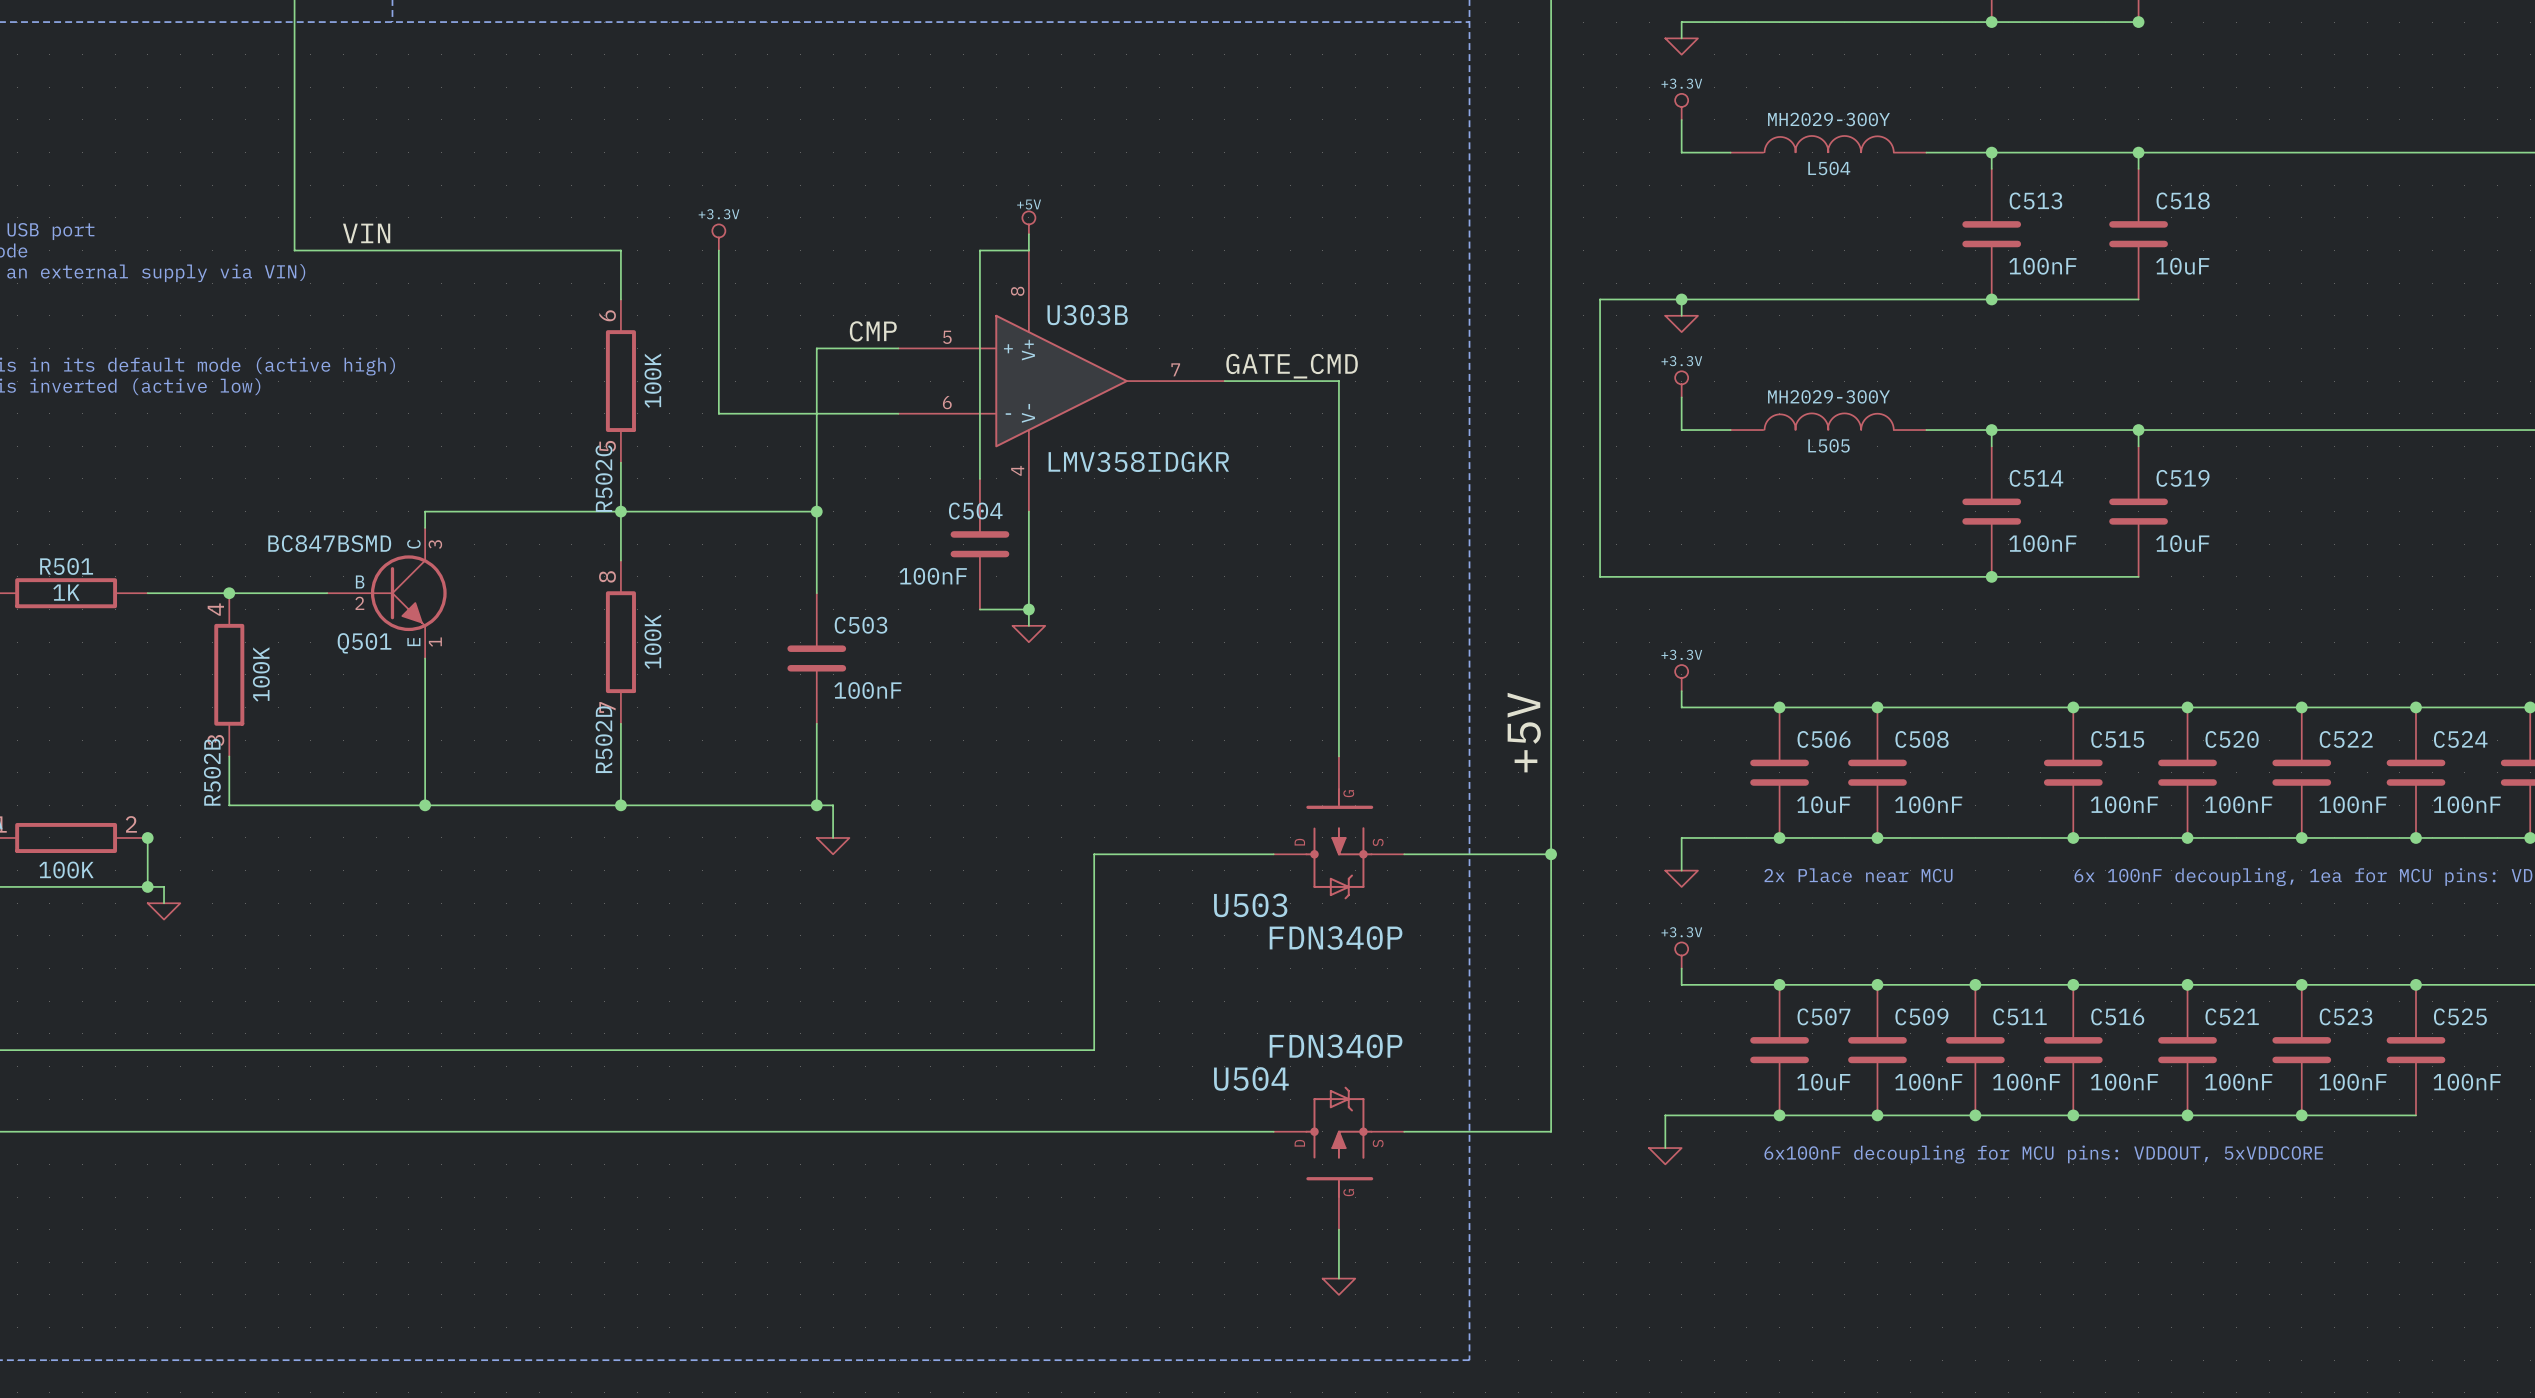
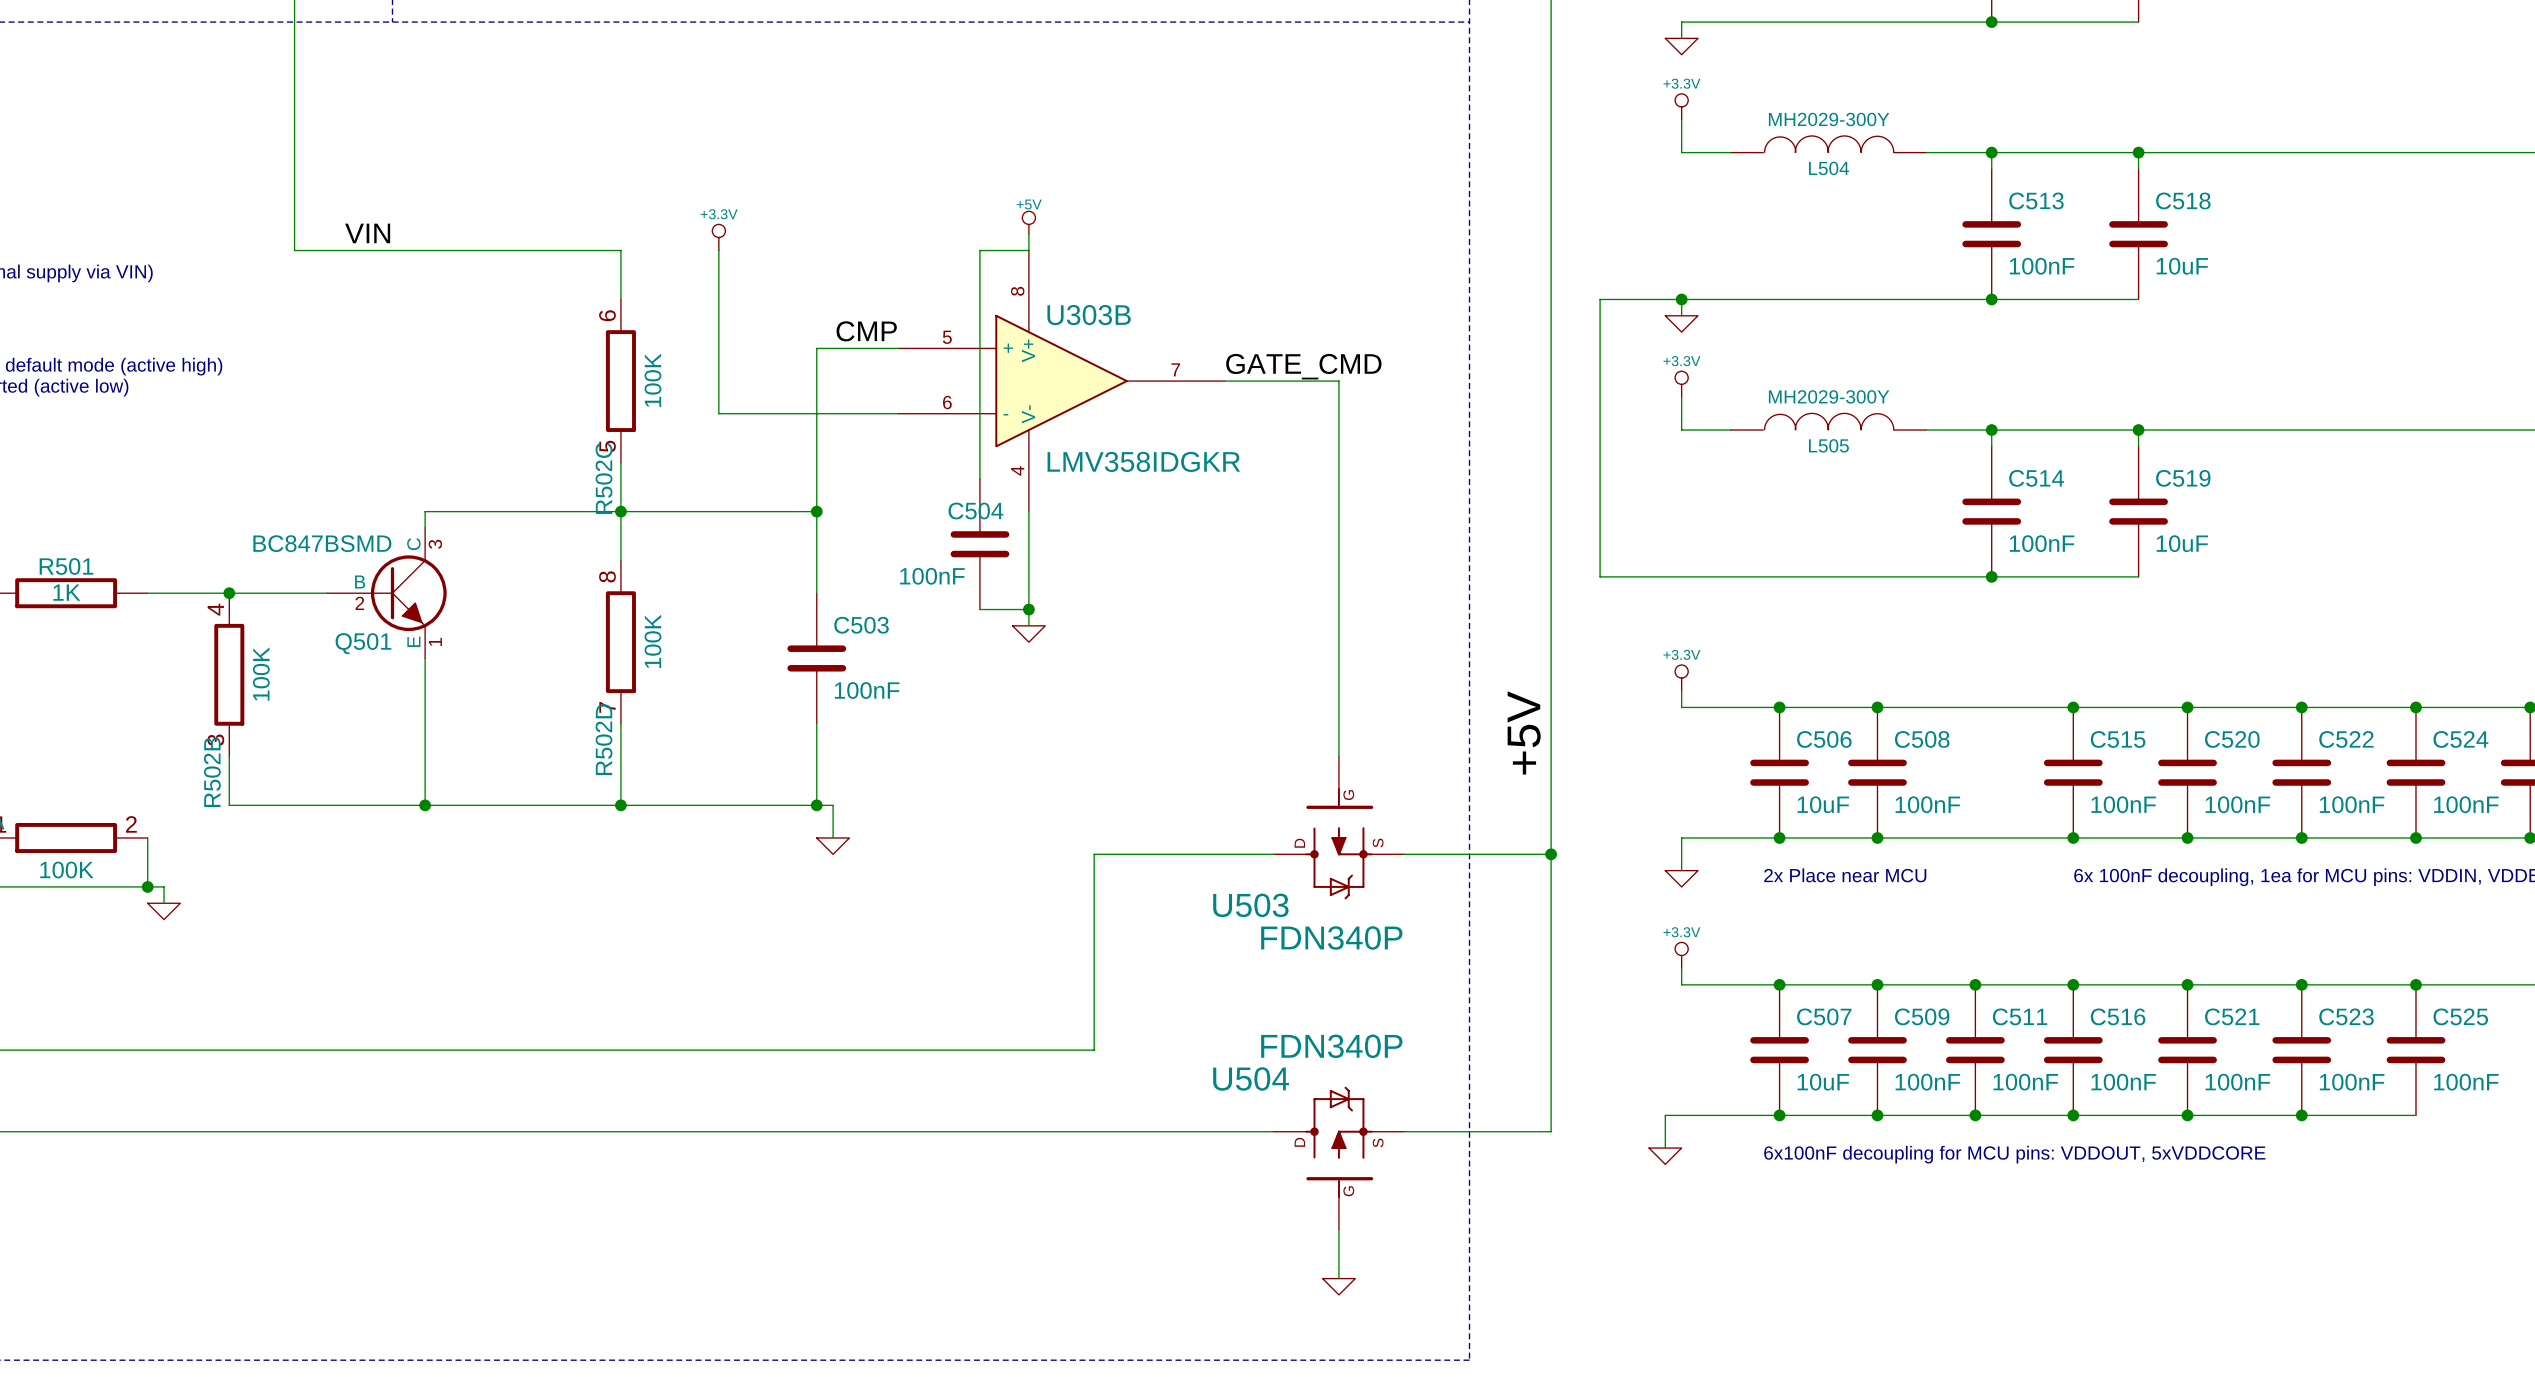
junction: (2138, 22) -> none
junction: (147, 837) -> none

